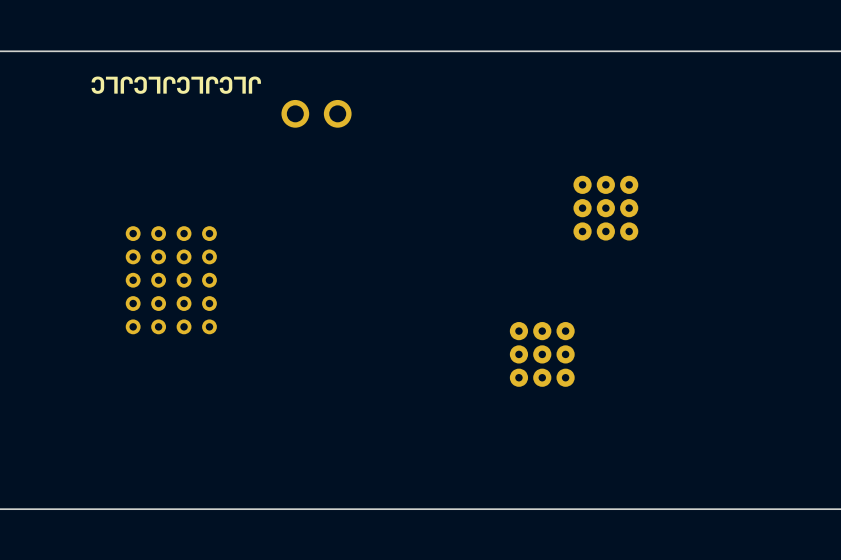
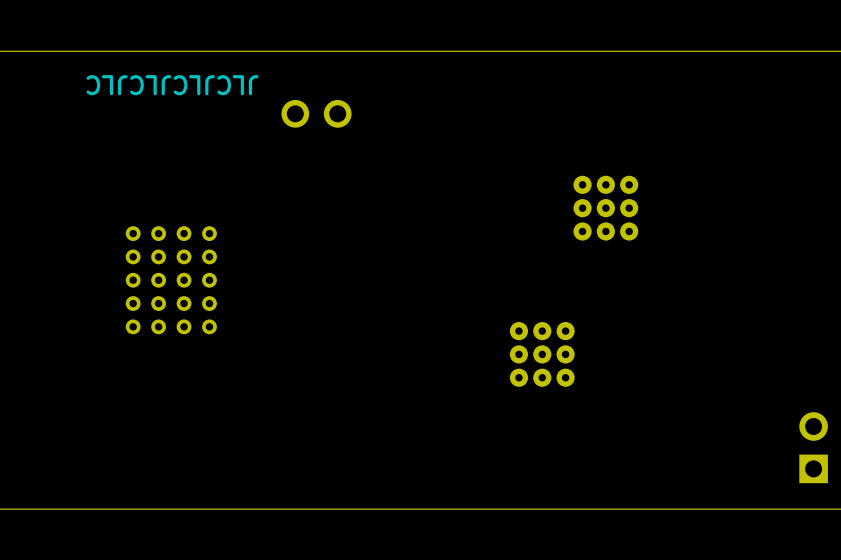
part: none -> (813, 447)

